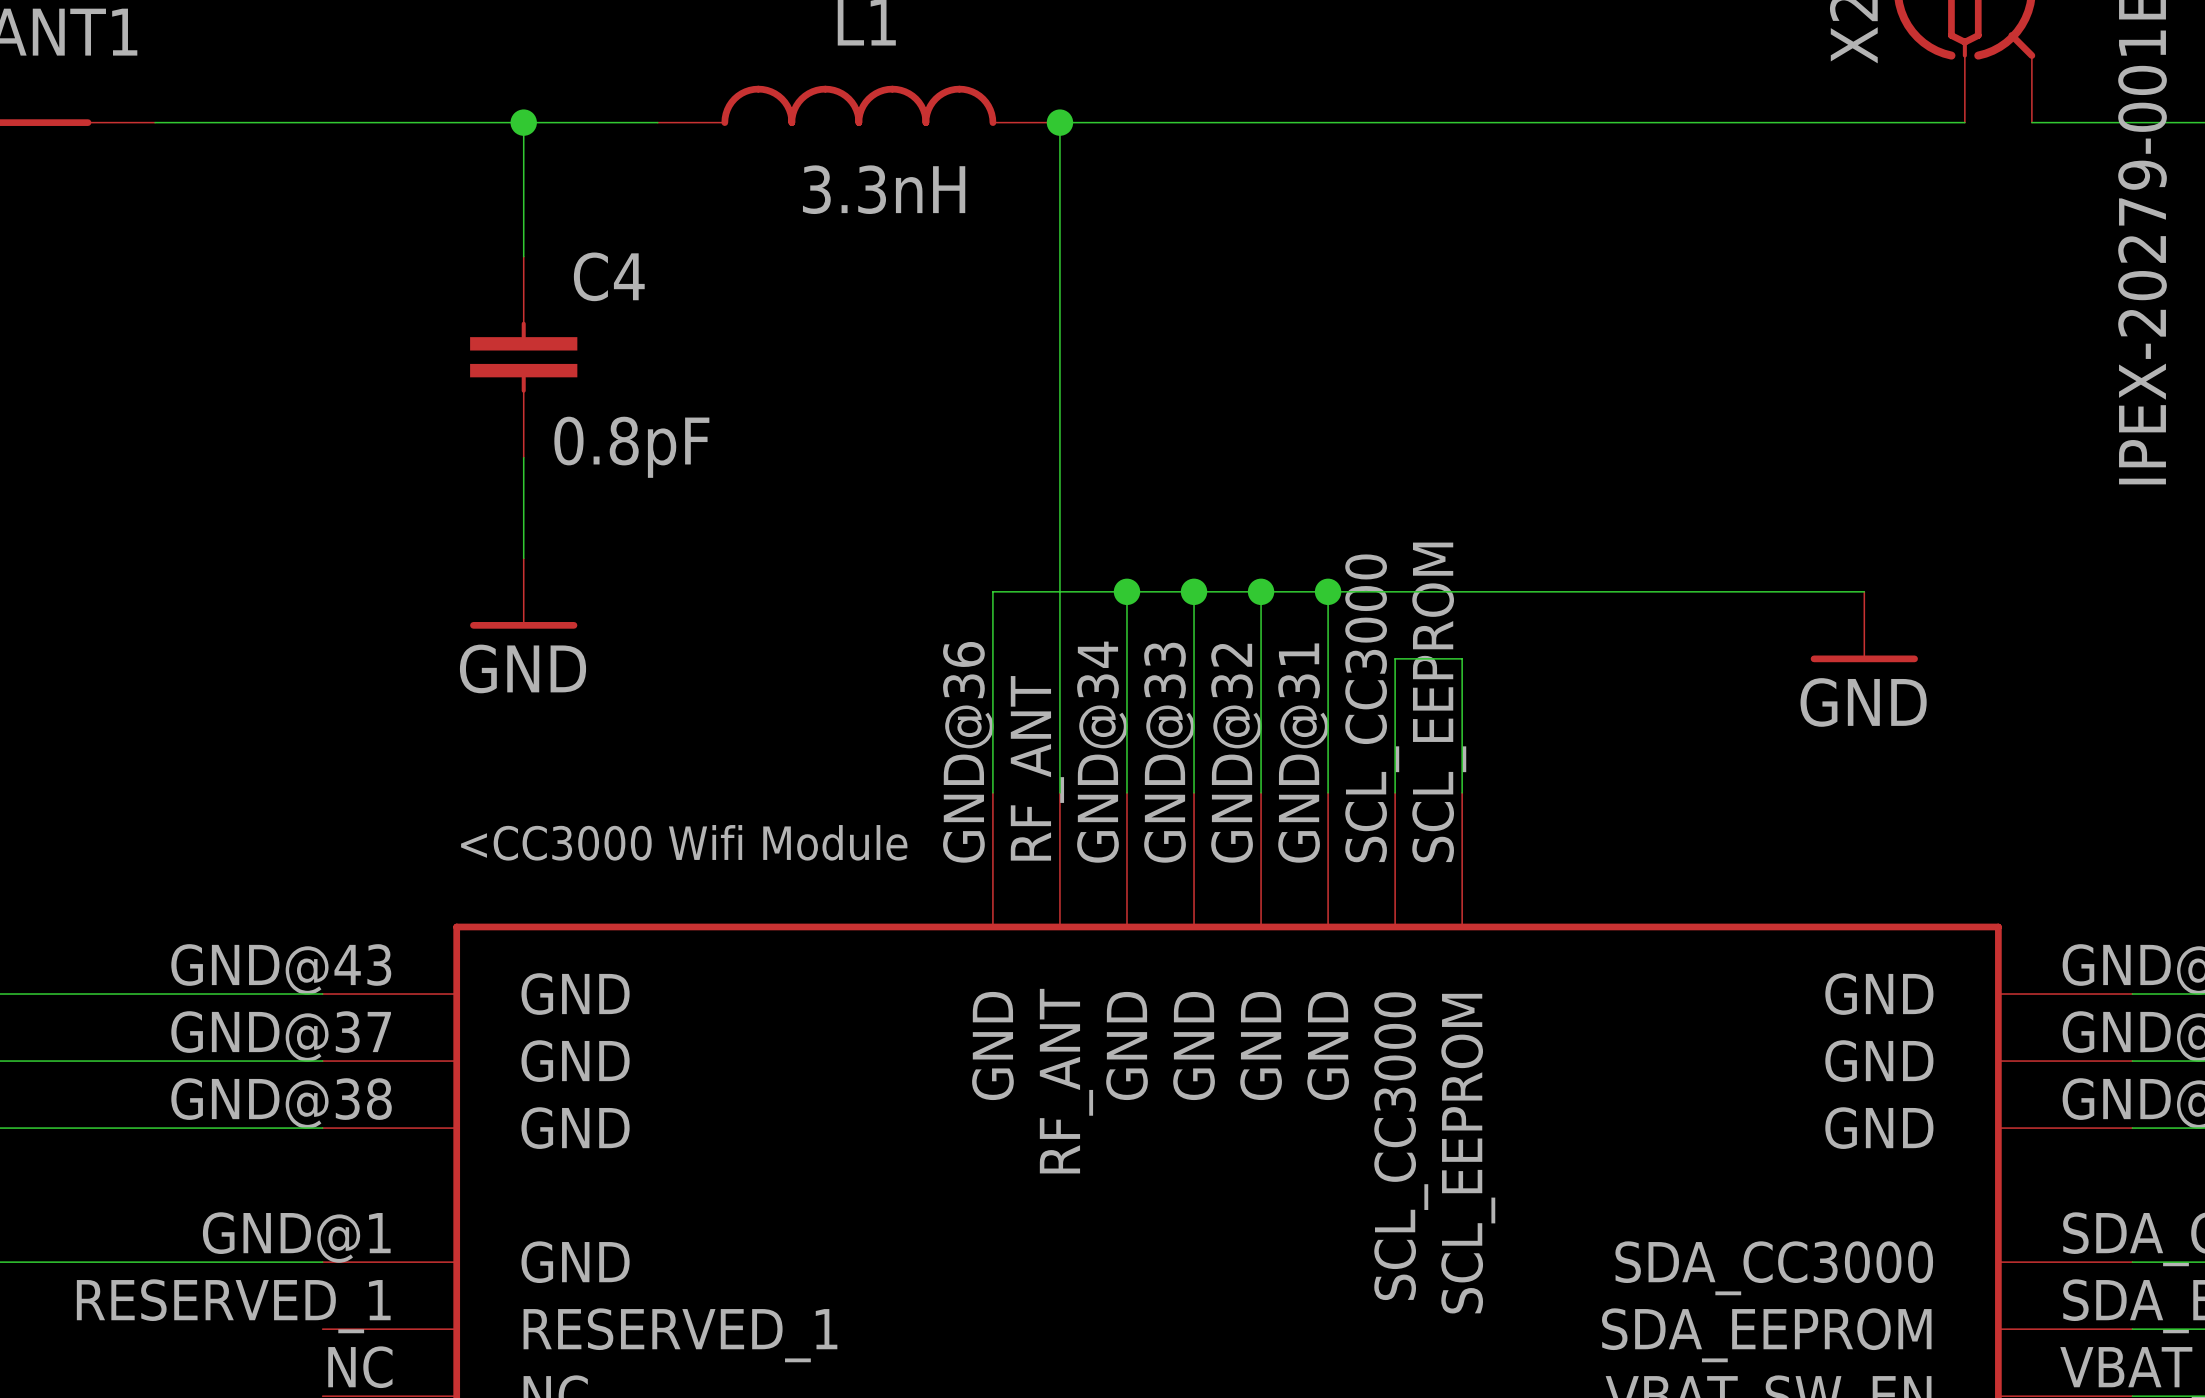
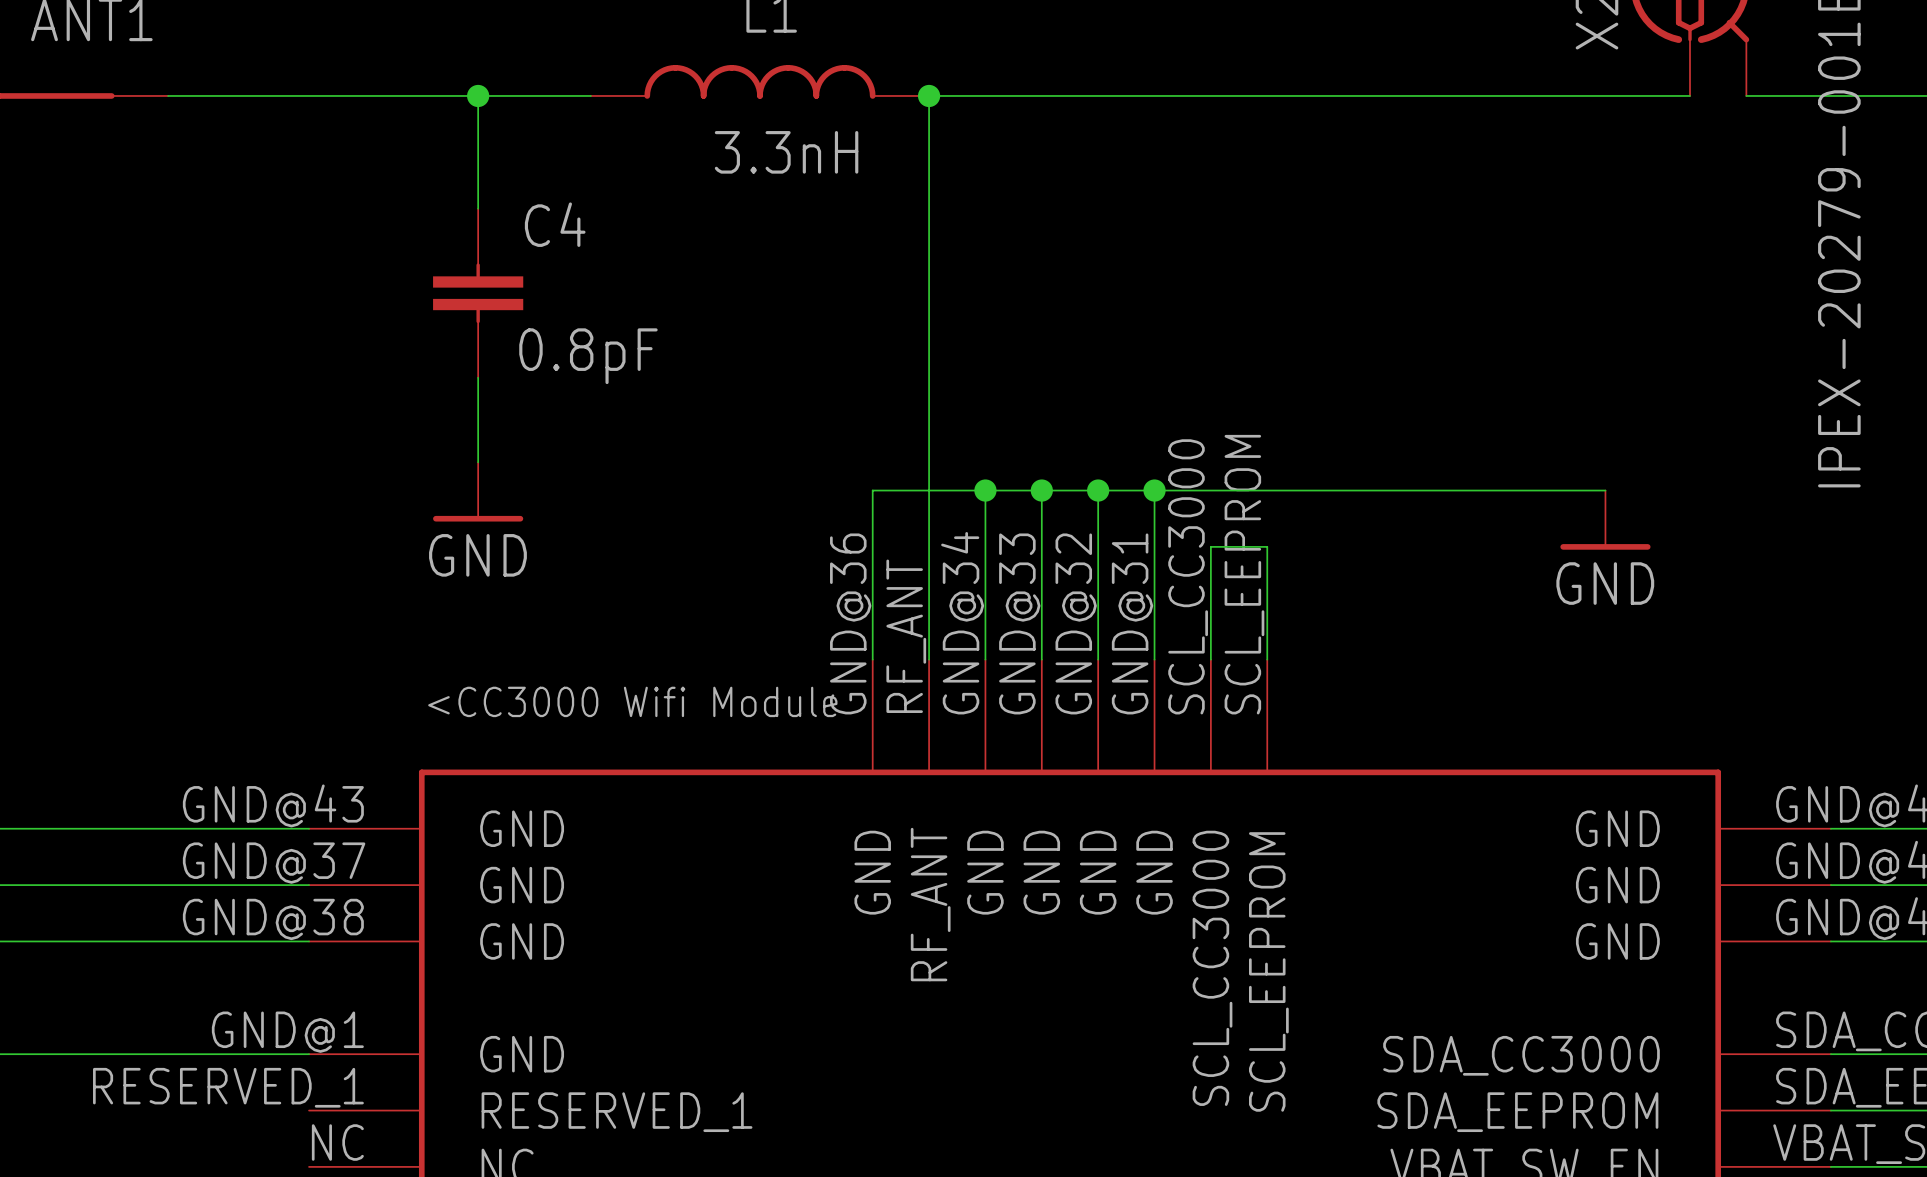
C4 value position: 0.8pF (631, 447) -> 0.8pF (588, 356)

